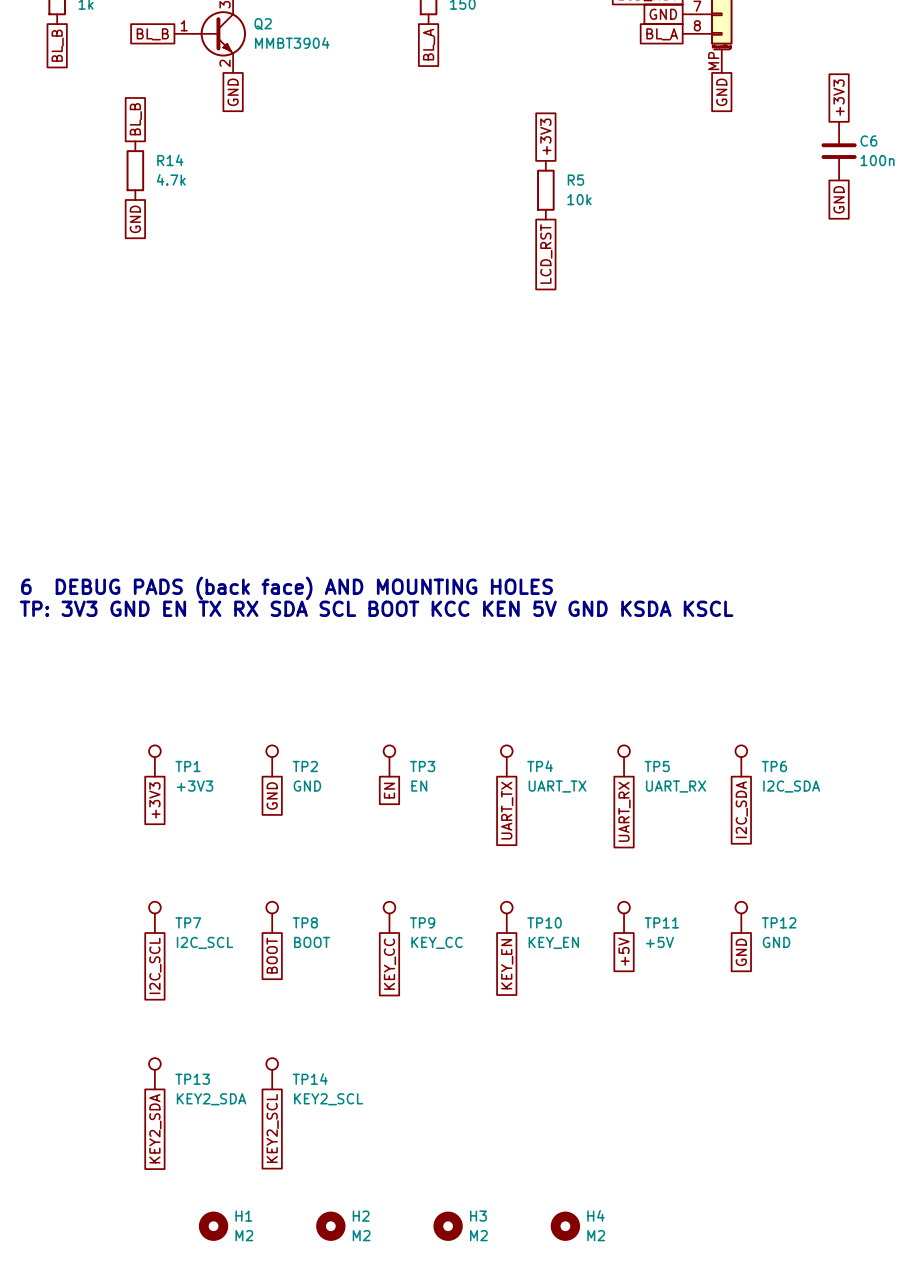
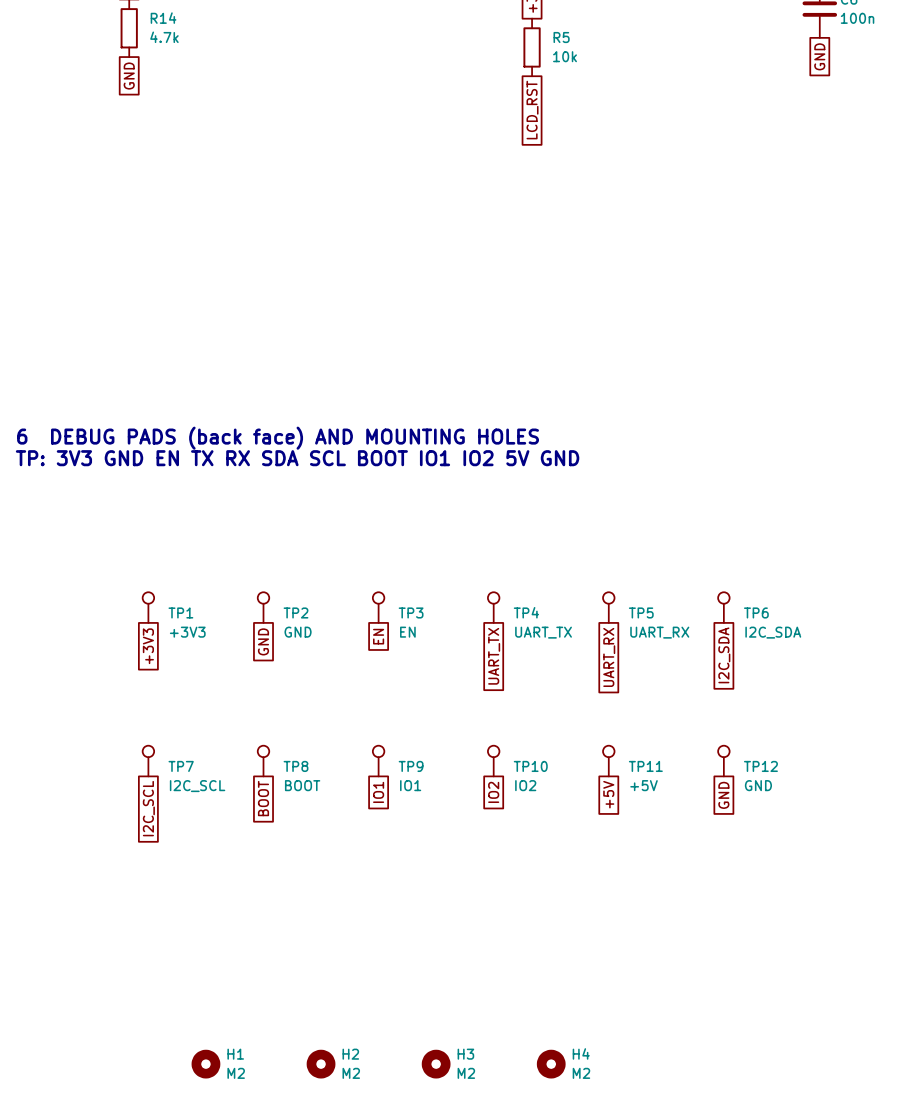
text: TP: 3V3 GND EN TX RX SDA SCL BOOT KCC KEN 5V GND KSDA KSCL (376, 608) -> TP: 3V3 GND EN TX RX SDA SCL BOOT IO1 IO2 5V GND (297, 458)
TP9 value: KEY_CC (437, 942) -> IO1 (410, 785)
TP10 value: KEY_EN (553, 942) -> IO2 (525, 785)
global label: KEY_CC (389, 964) -> IO1 (378, 792)
global label: KEY_EN (507, 964) -> IO2 (493, 792)
TP13: KEY2_SDA (154, 1073) -> none
TP14: KEY2_SCL (272, 1073) -> none
global label: KEY2_SDA (155, 1128) -> none
global label: KEY2_SCL (272, 1128) -> none

